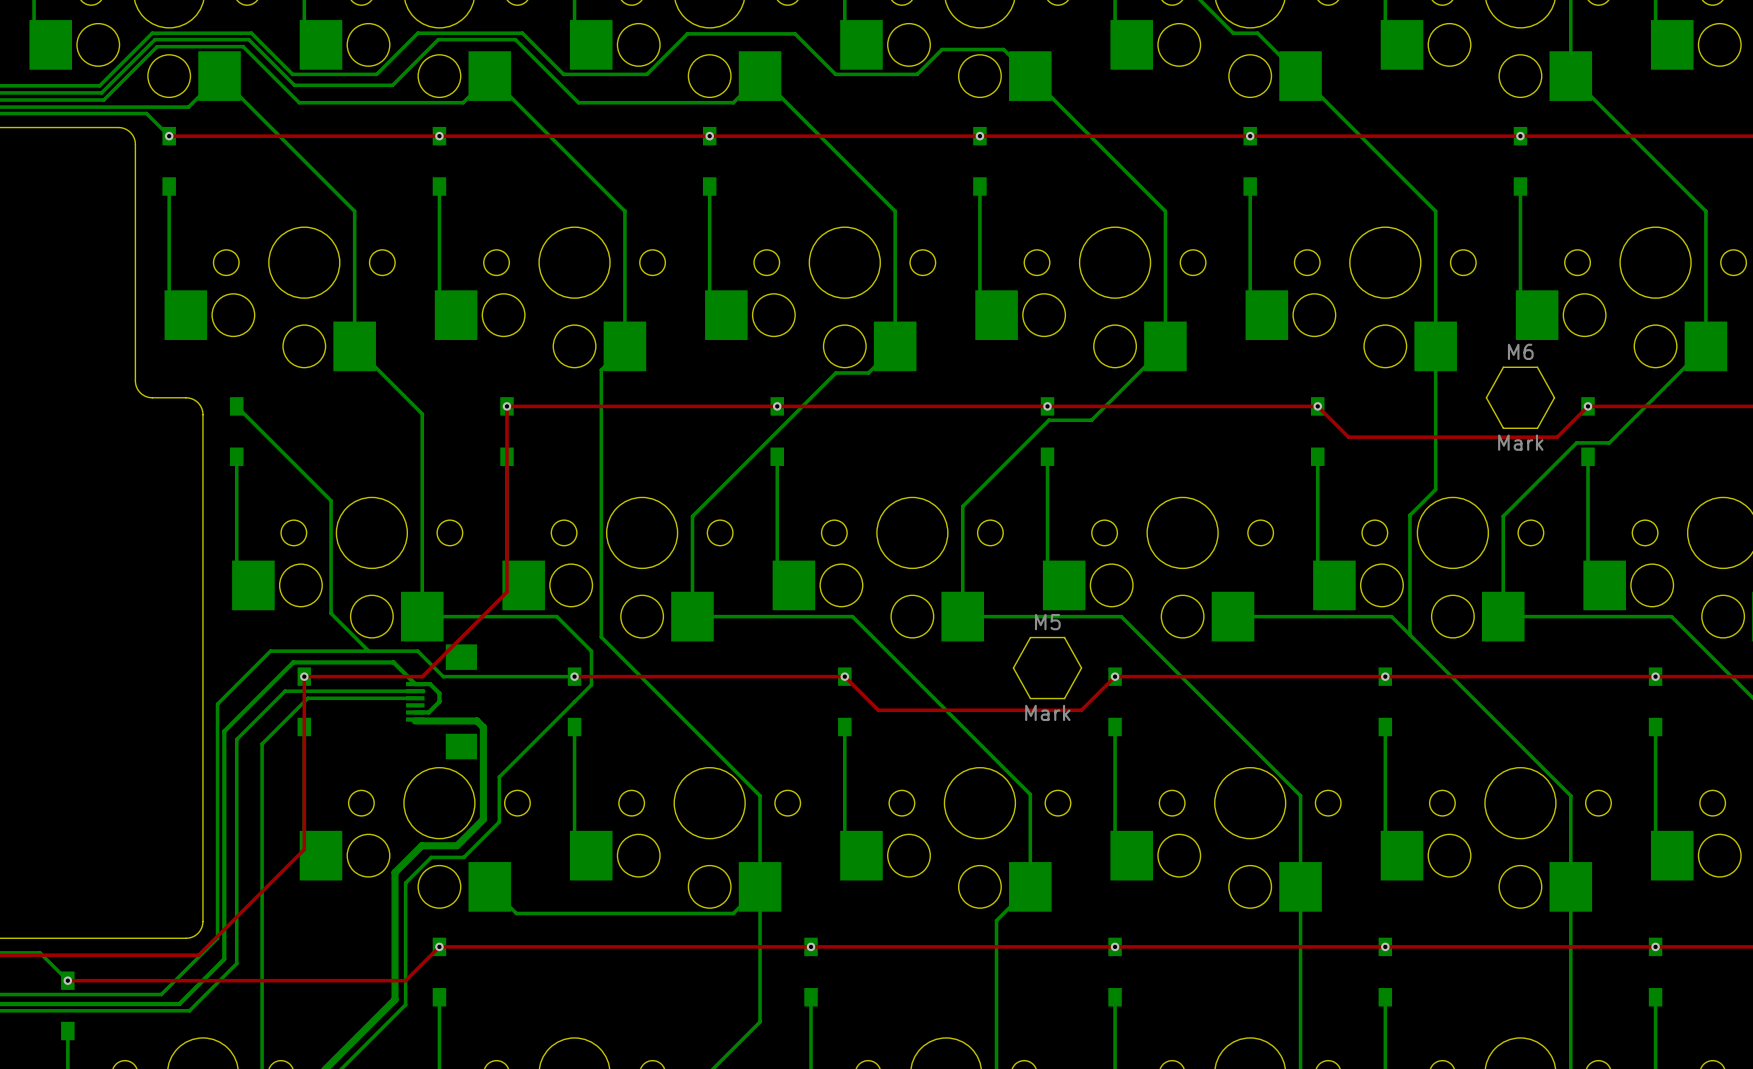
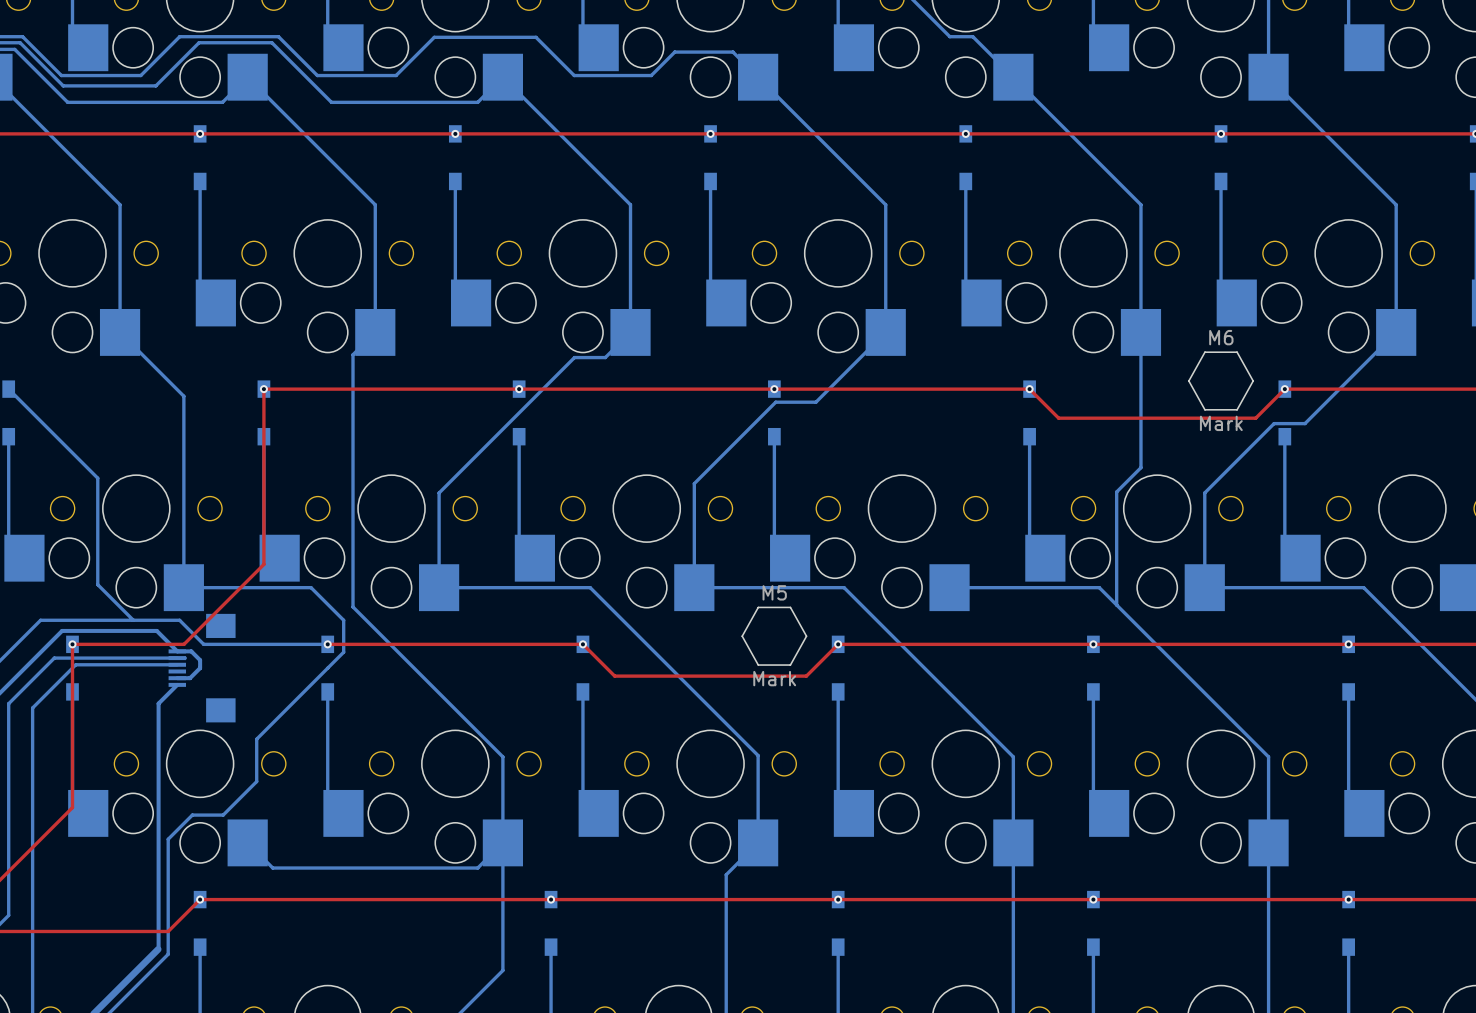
bottom track: (415, 720) (477, 720) (483, 727) (483, 819) (457, 845) (421, 845) (395, 872) (395, 999) -> (177, 684) (158, 703) (158, 949)

